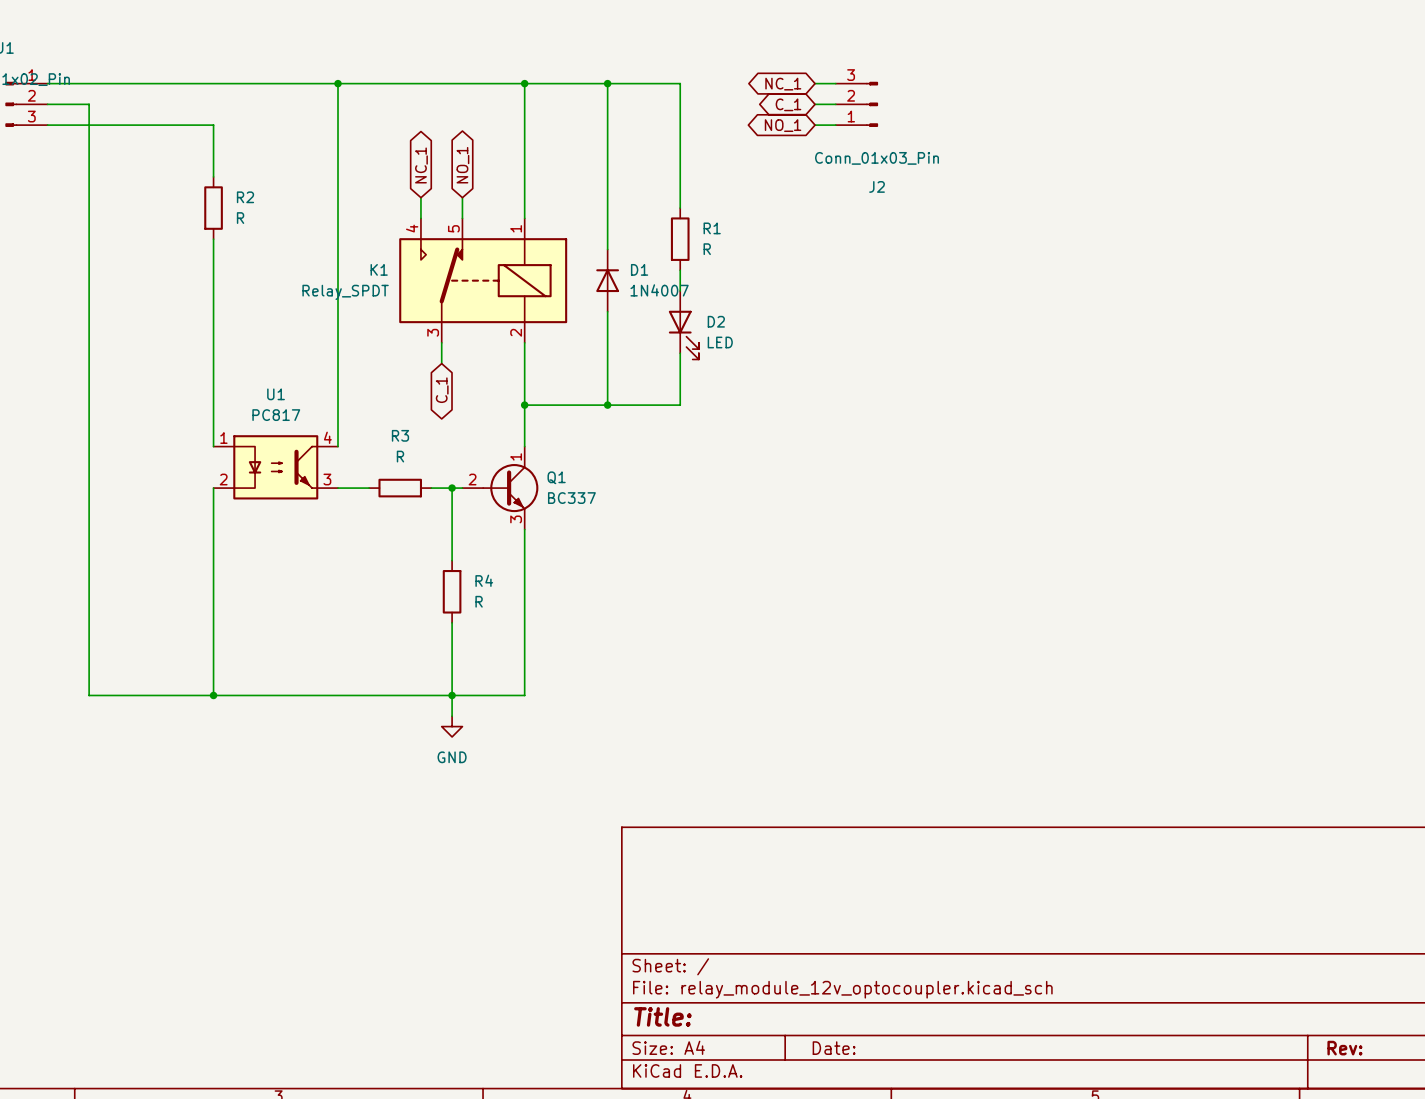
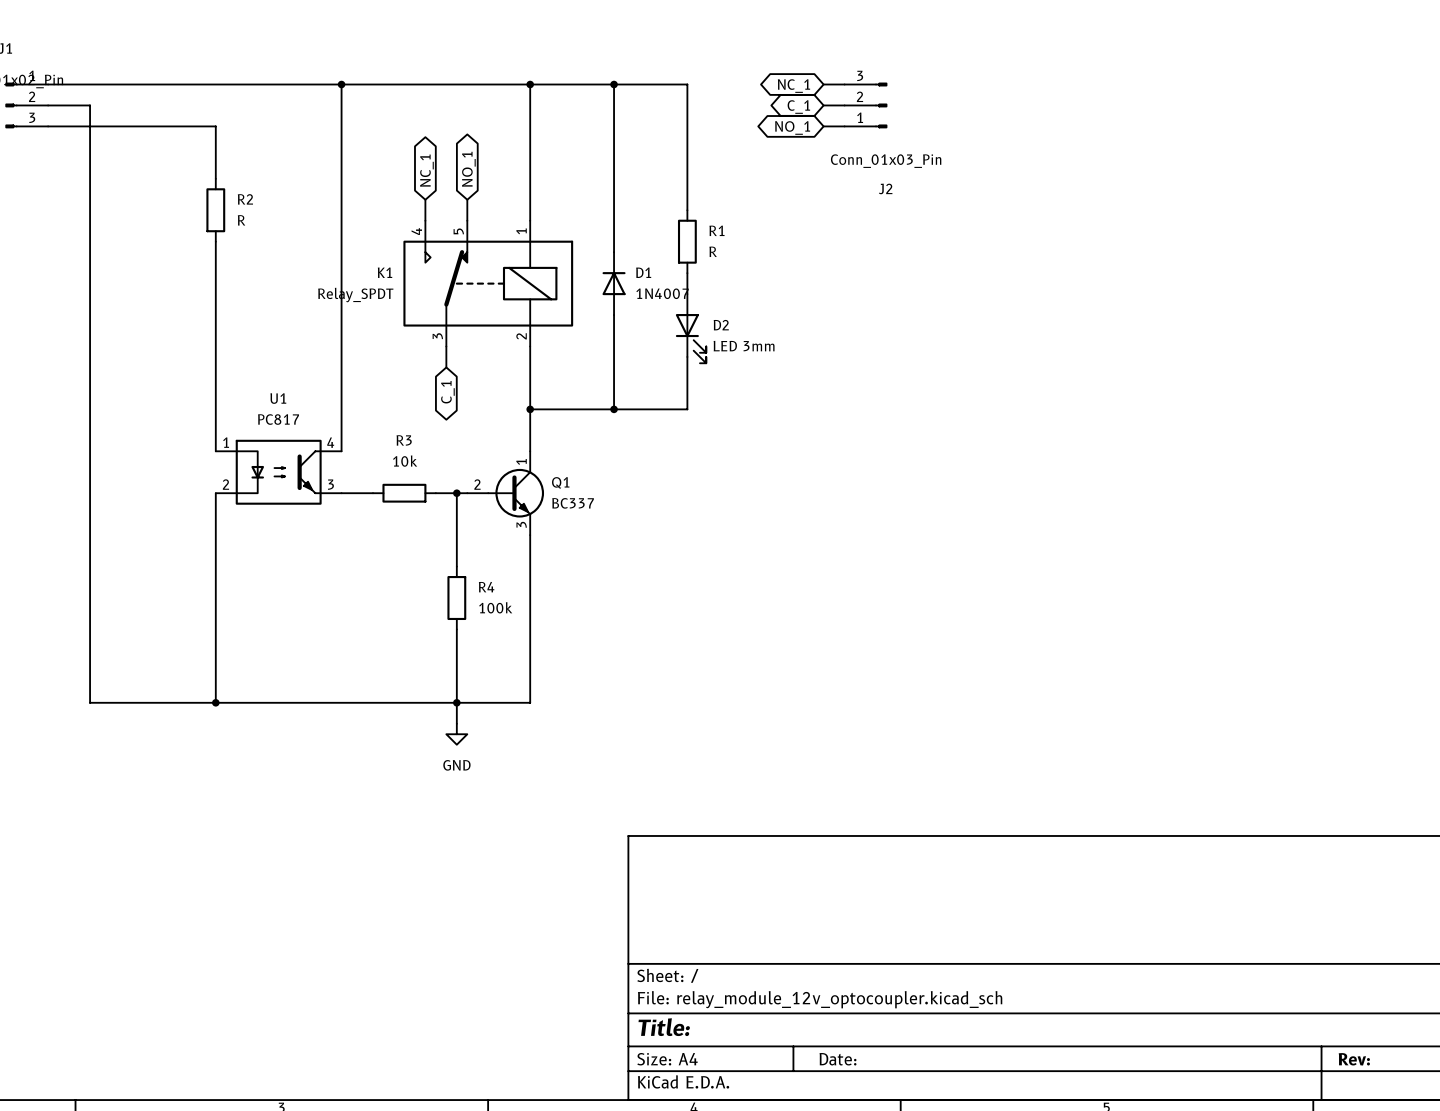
D2 value: LED (720, 342) -> LED 3mm (744, 346)
R3 value: R (400, 456) -> 10k (405, 461)
R4 value: R (479, 601) -> 100k (495, 607)

